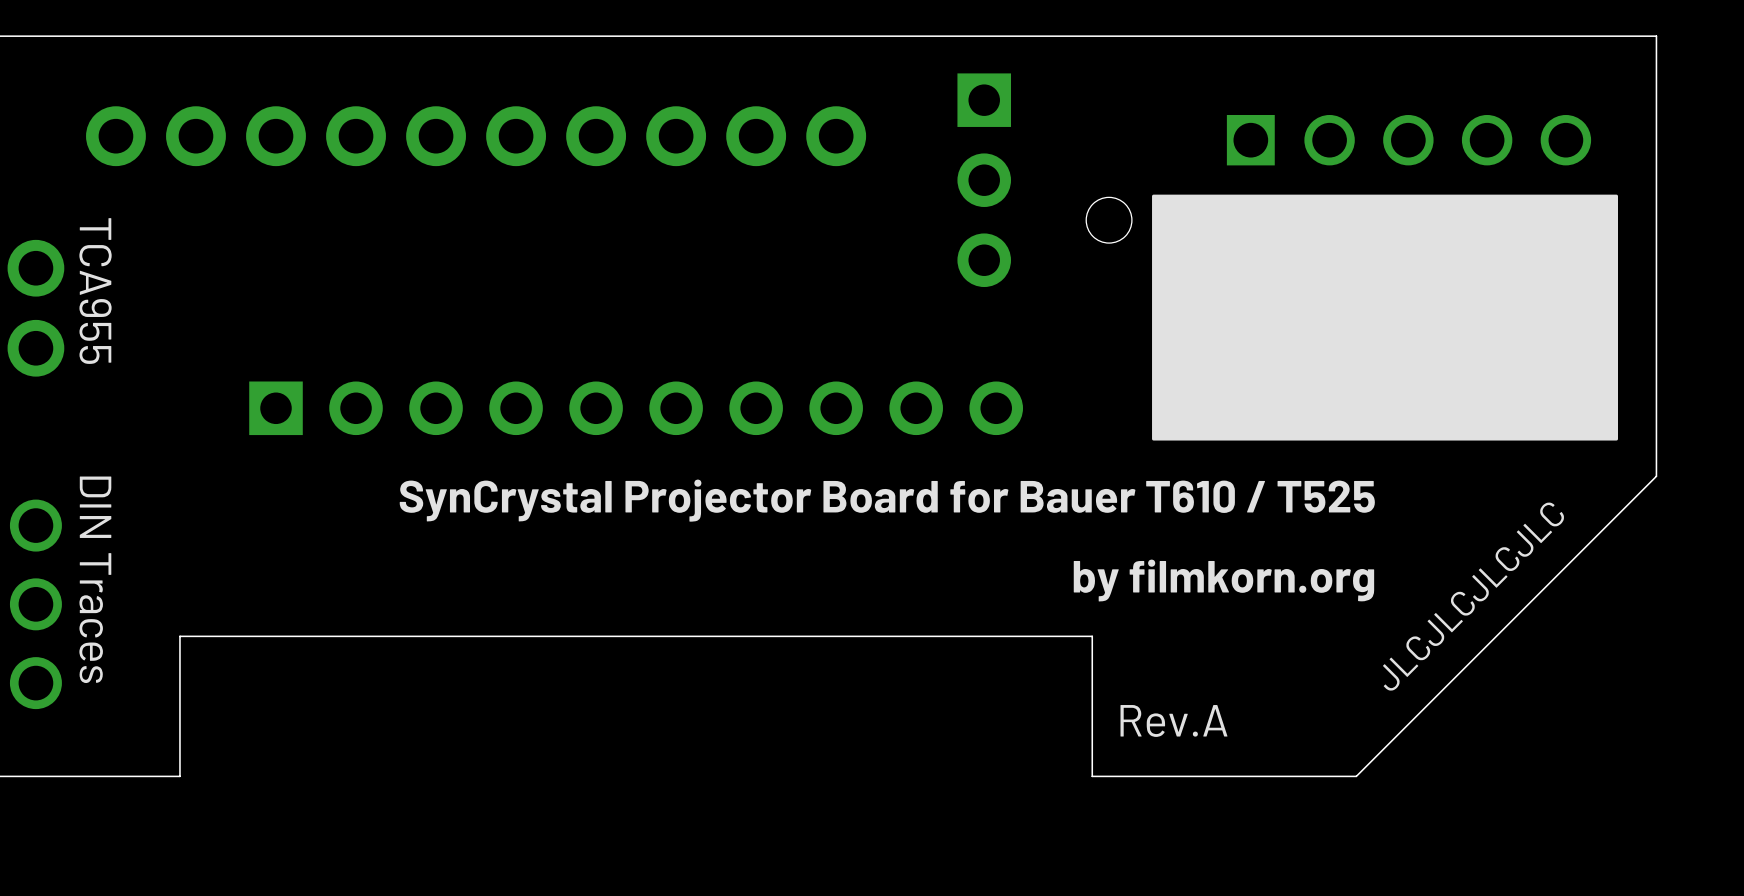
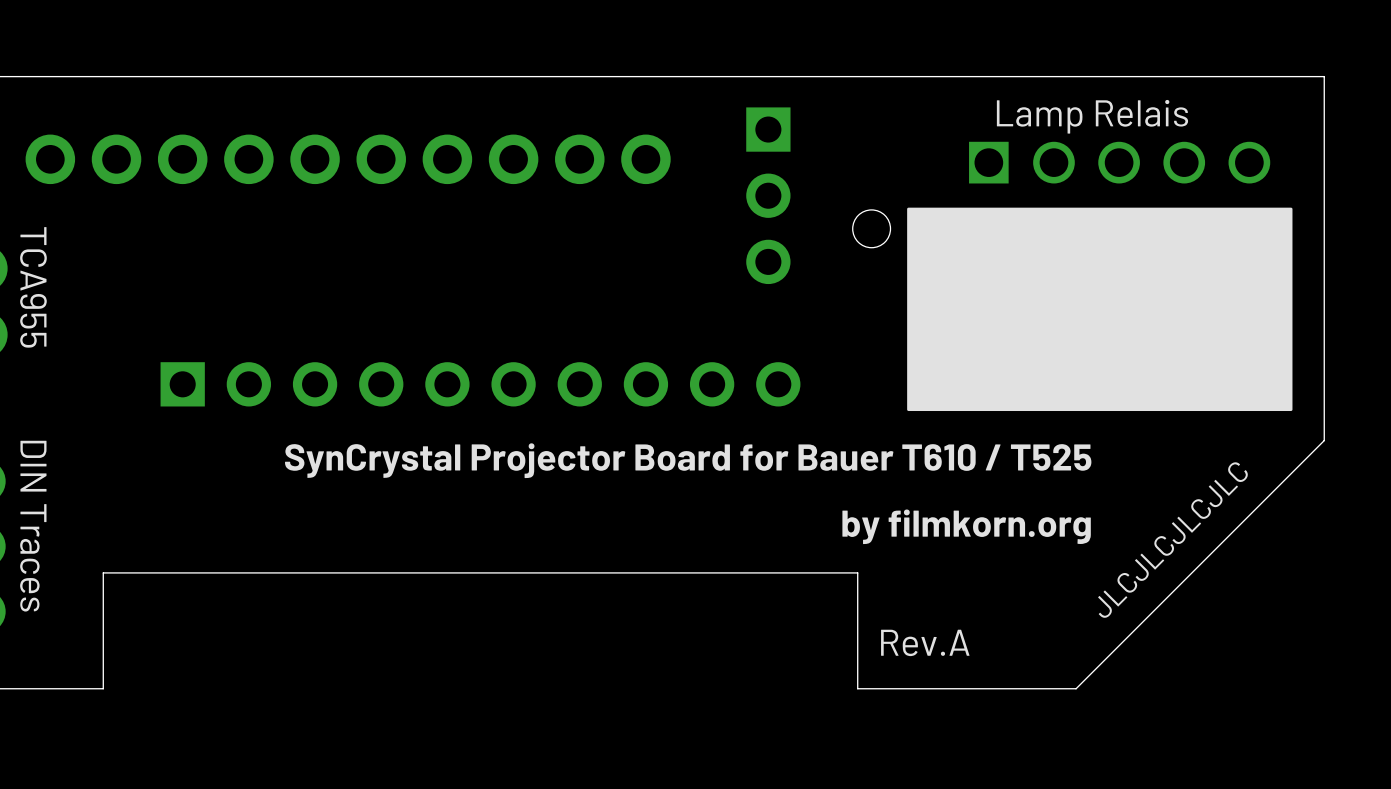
text: none -> Lamp Relais (1092, 116)

